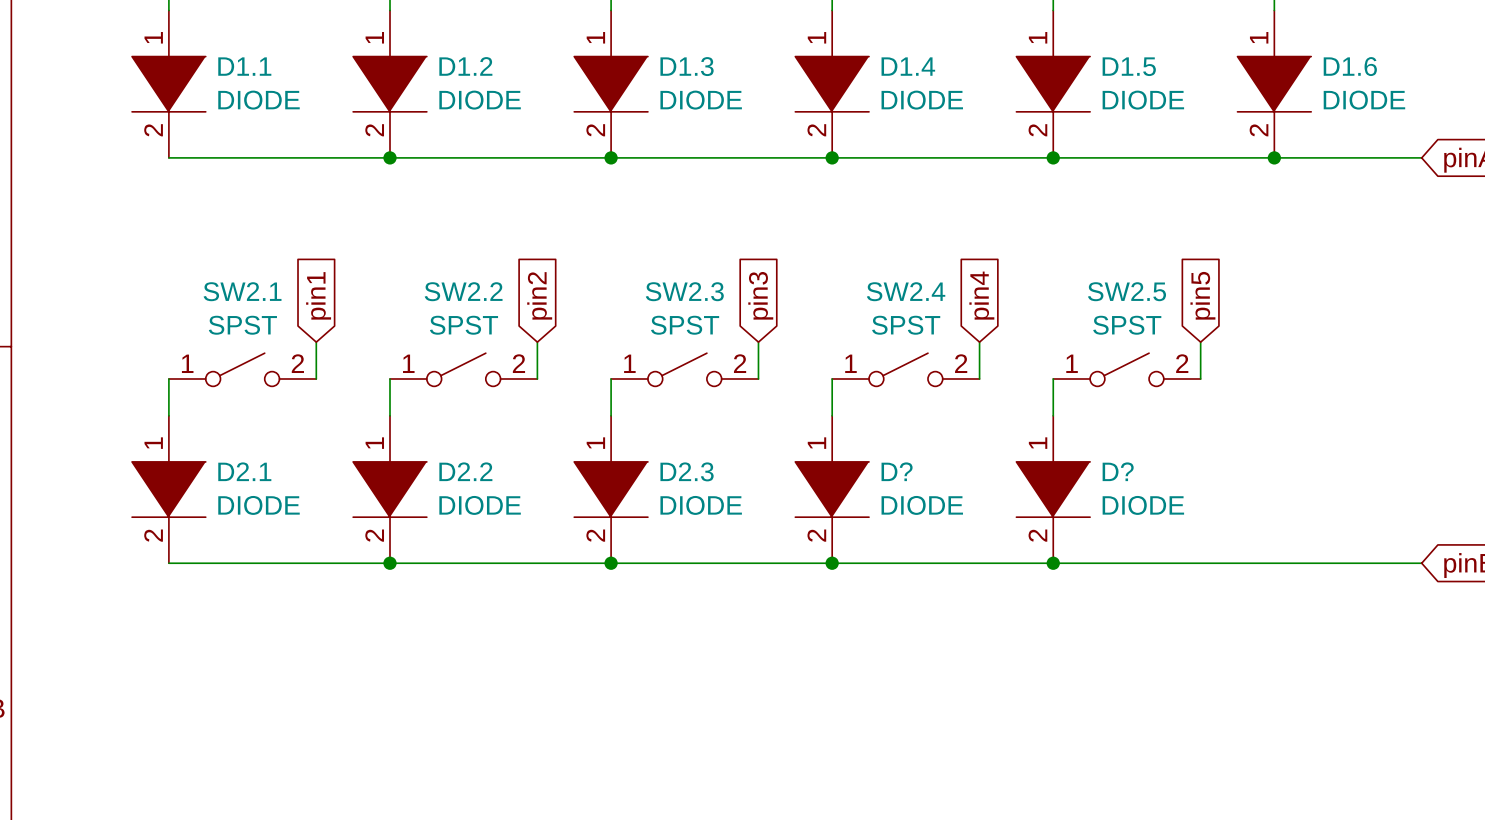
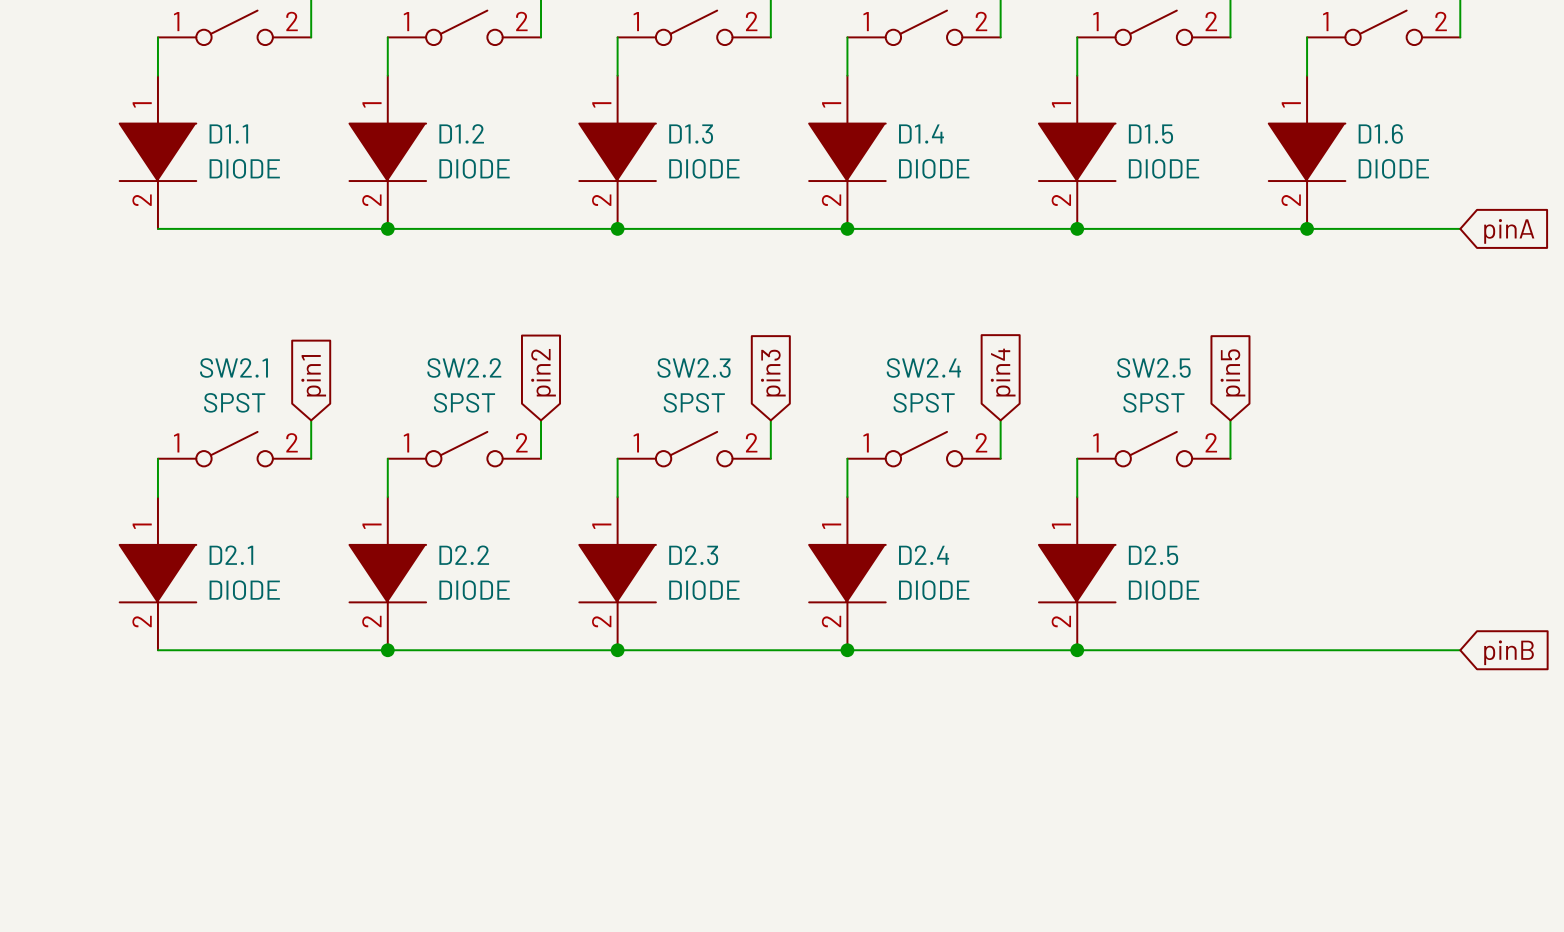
D? name: D? (897, 471) -> D2.4 (924, 555)
D? name: D? (1118, 471) -> D2.5 (1153, 555)

